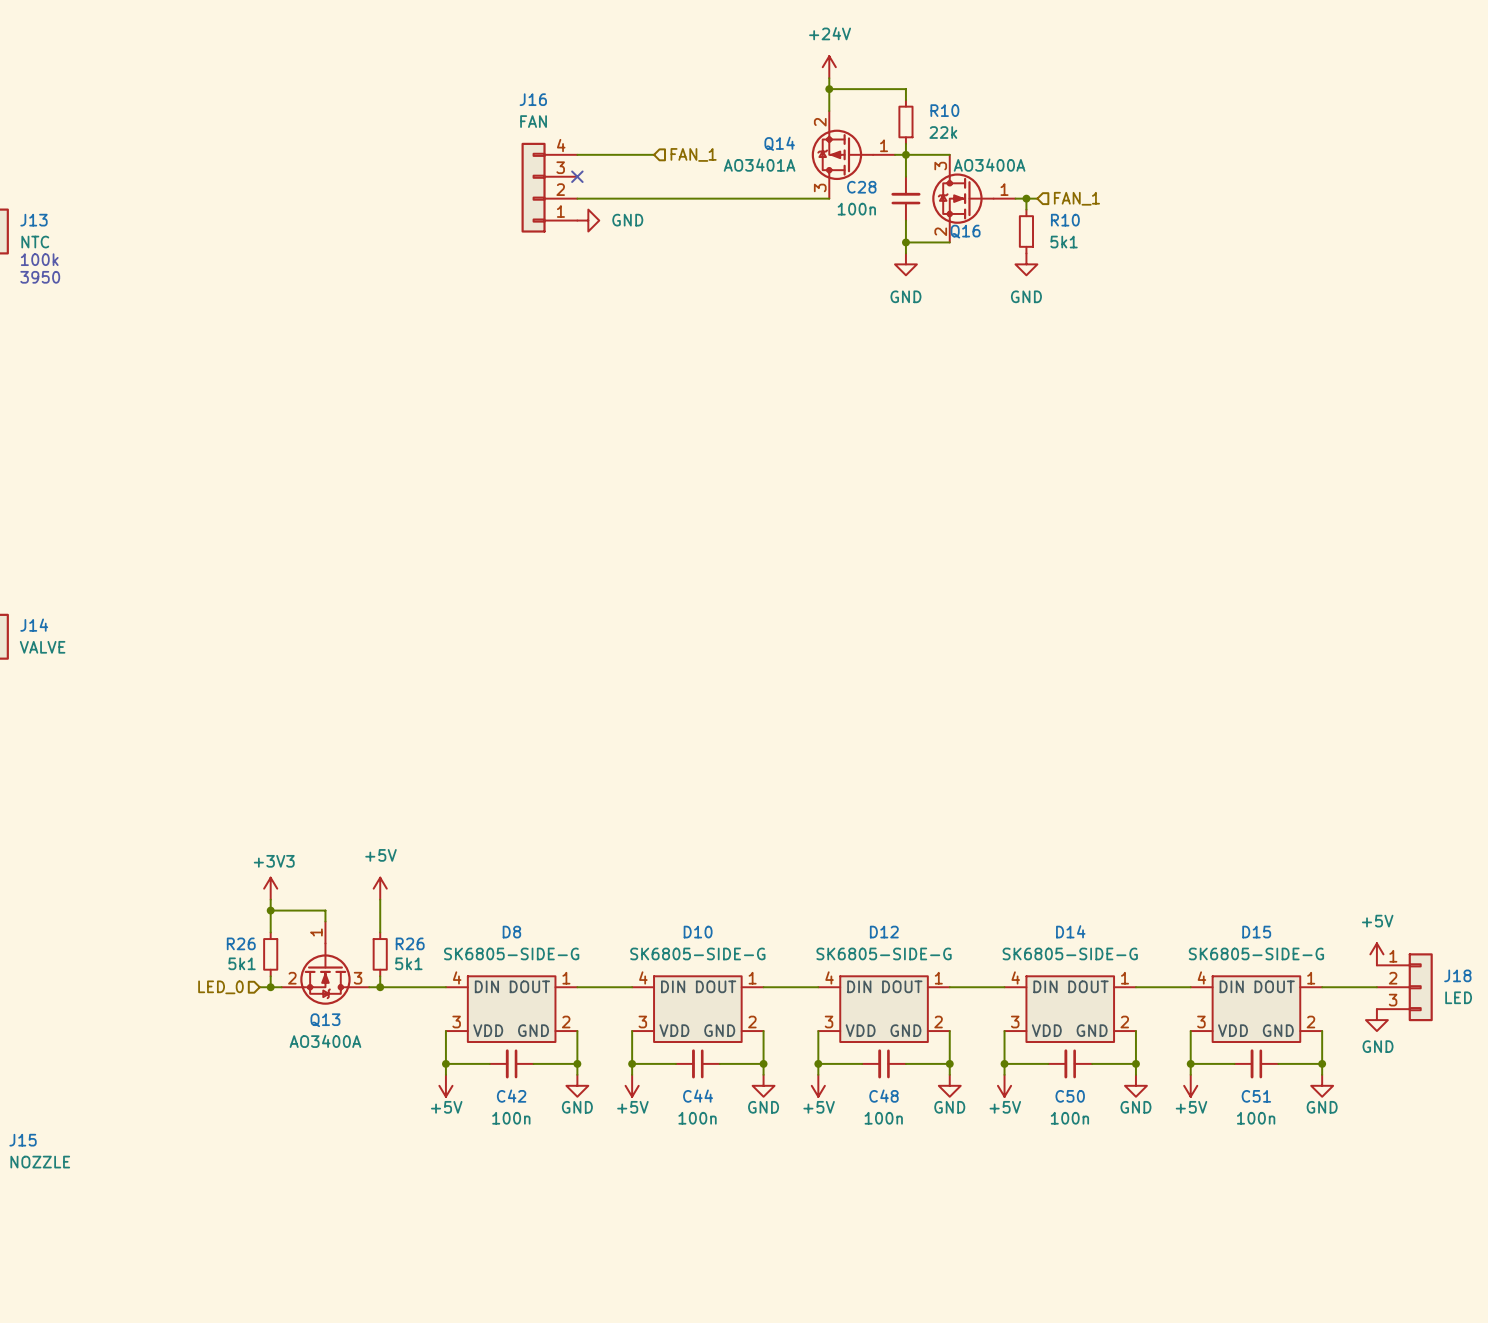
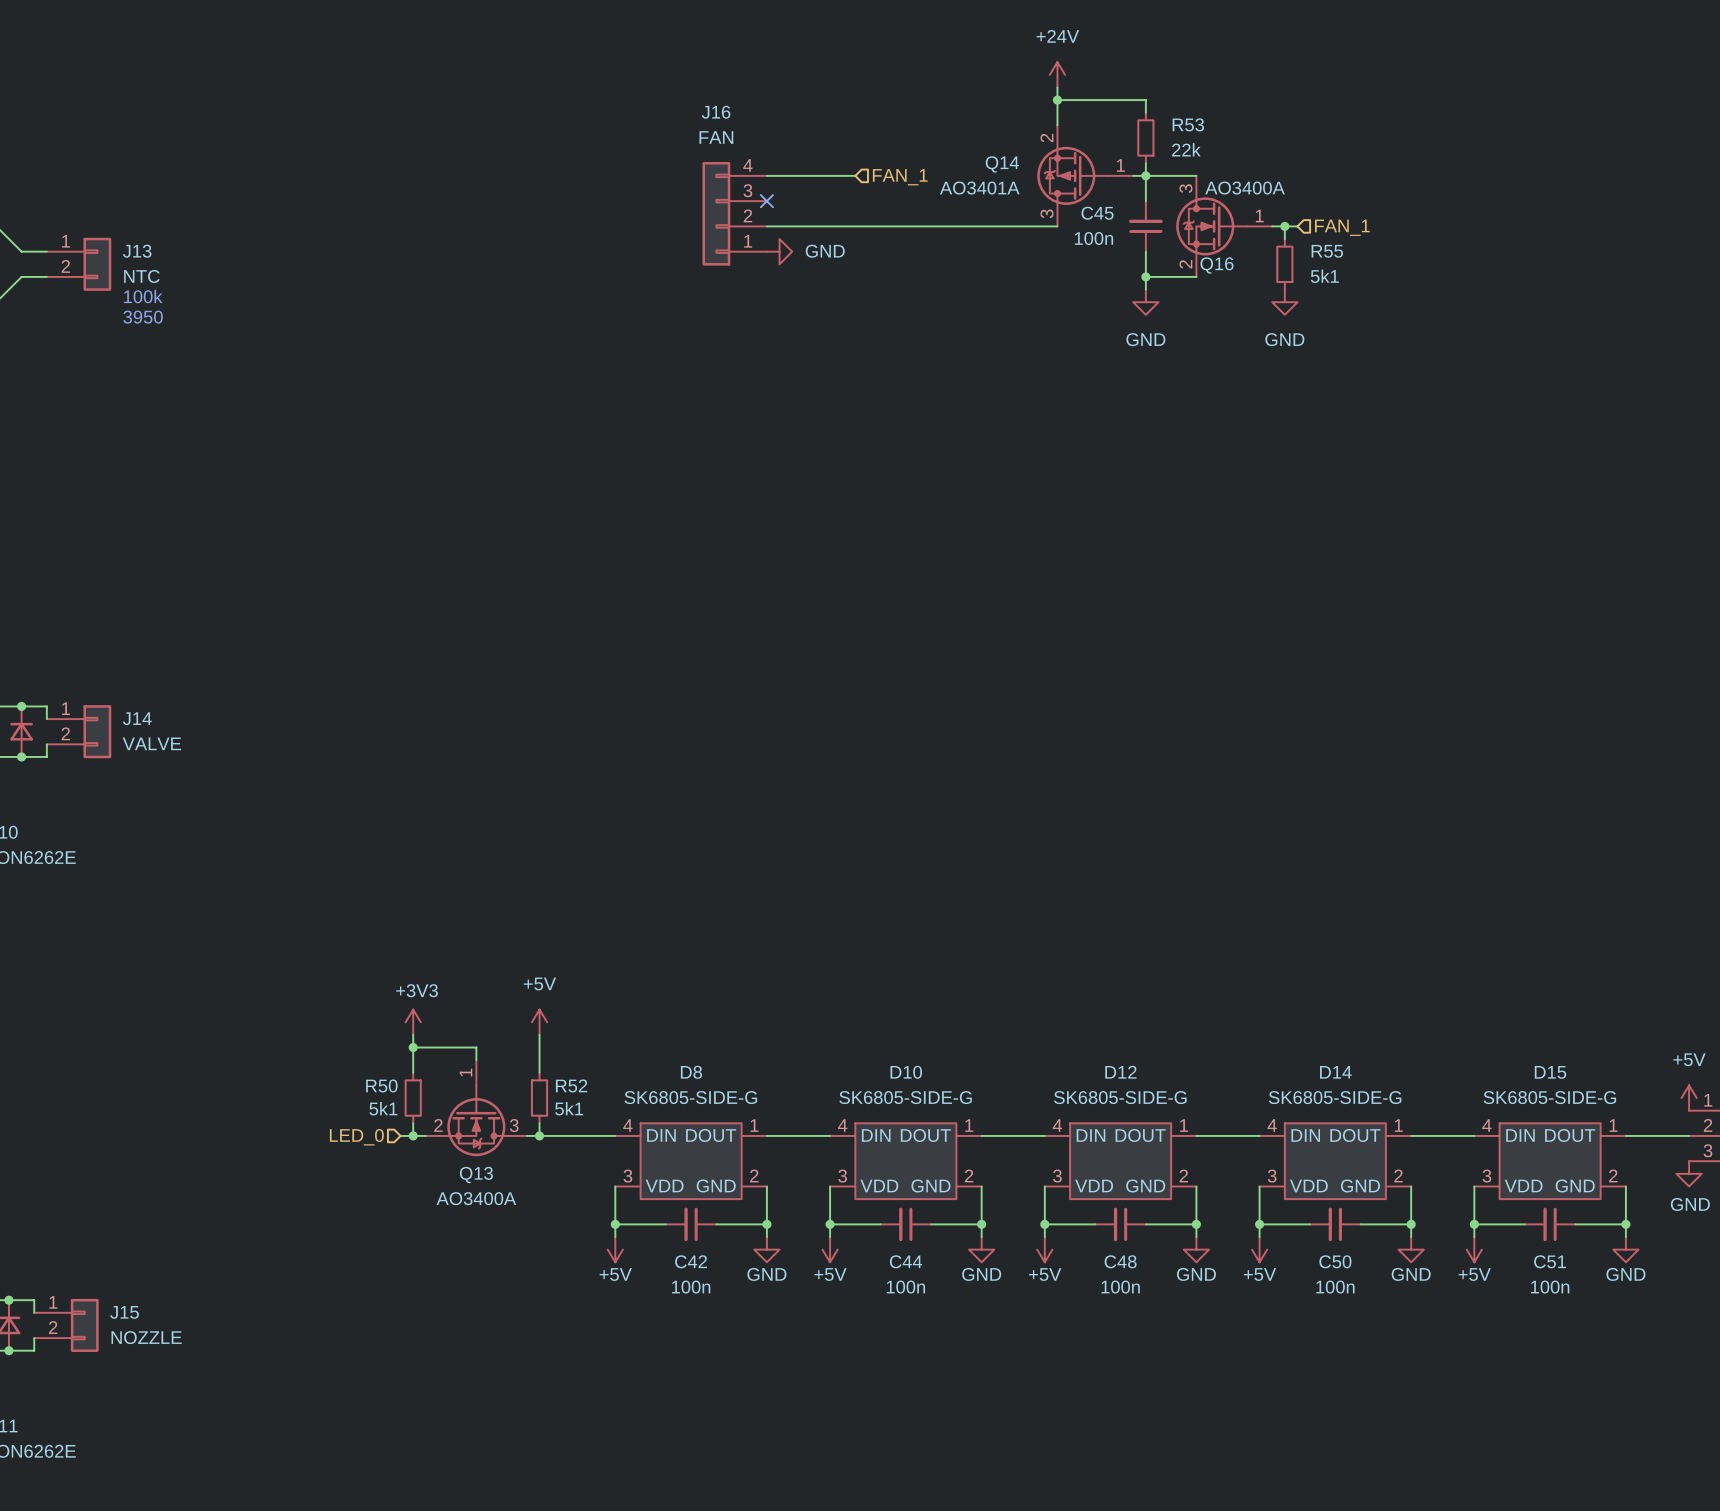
R10 name: R10 (944, 110) -> R53 (1188, 124)
C28 name: C28 (861, 187) -> C45 (1097, 213)
R10 name: R10 (1065, 220) -> R55 (1327, 251)
R26 name: R26 (241, 943) -> R50 (381, 1085)
R26 name: R26 (410, 943) -> R52 (571, 1085)

